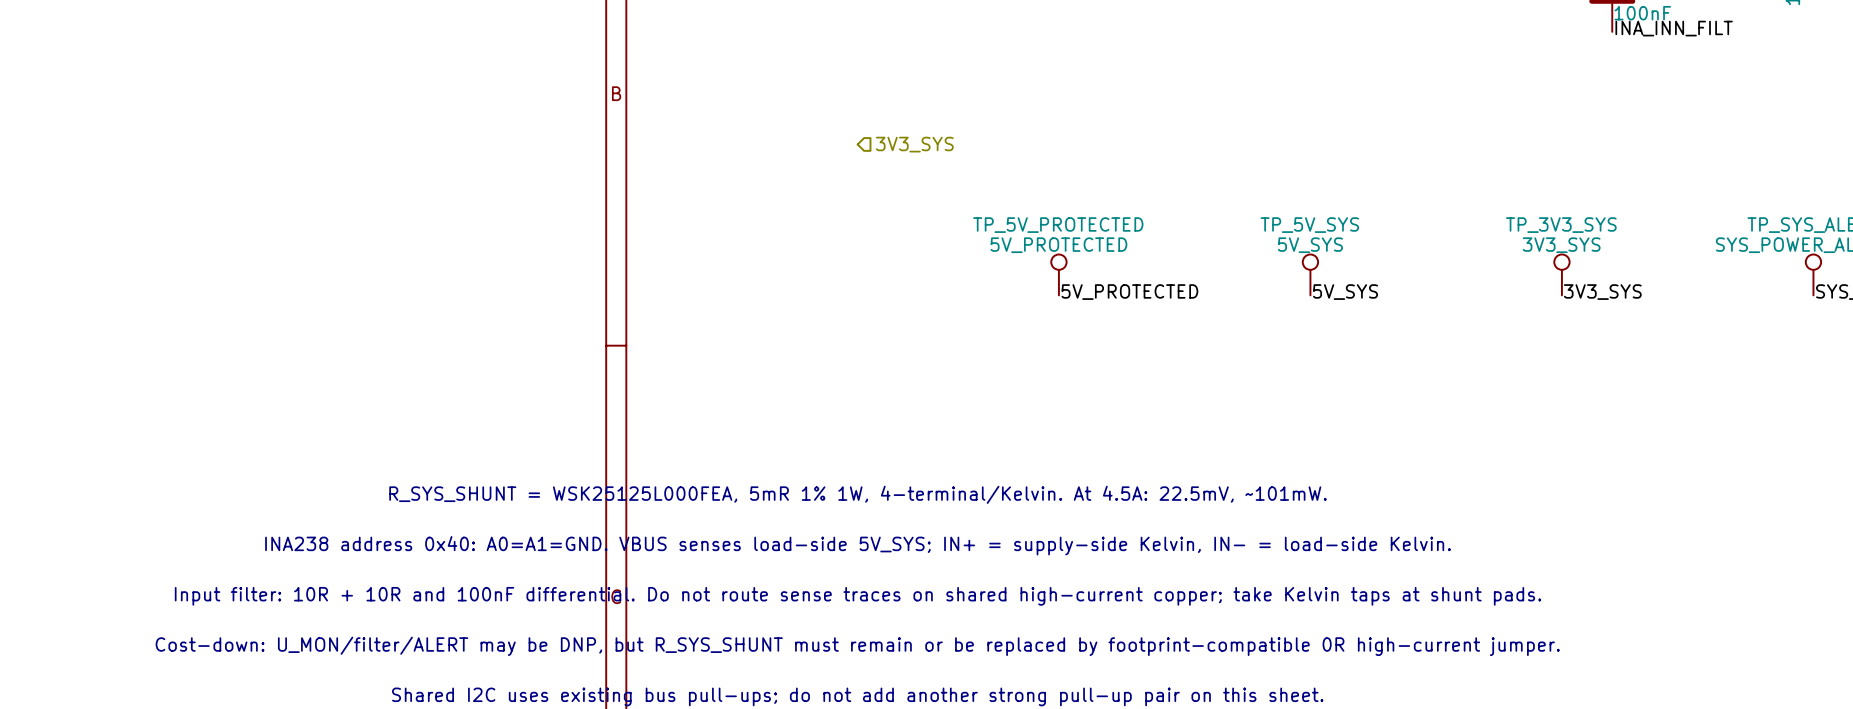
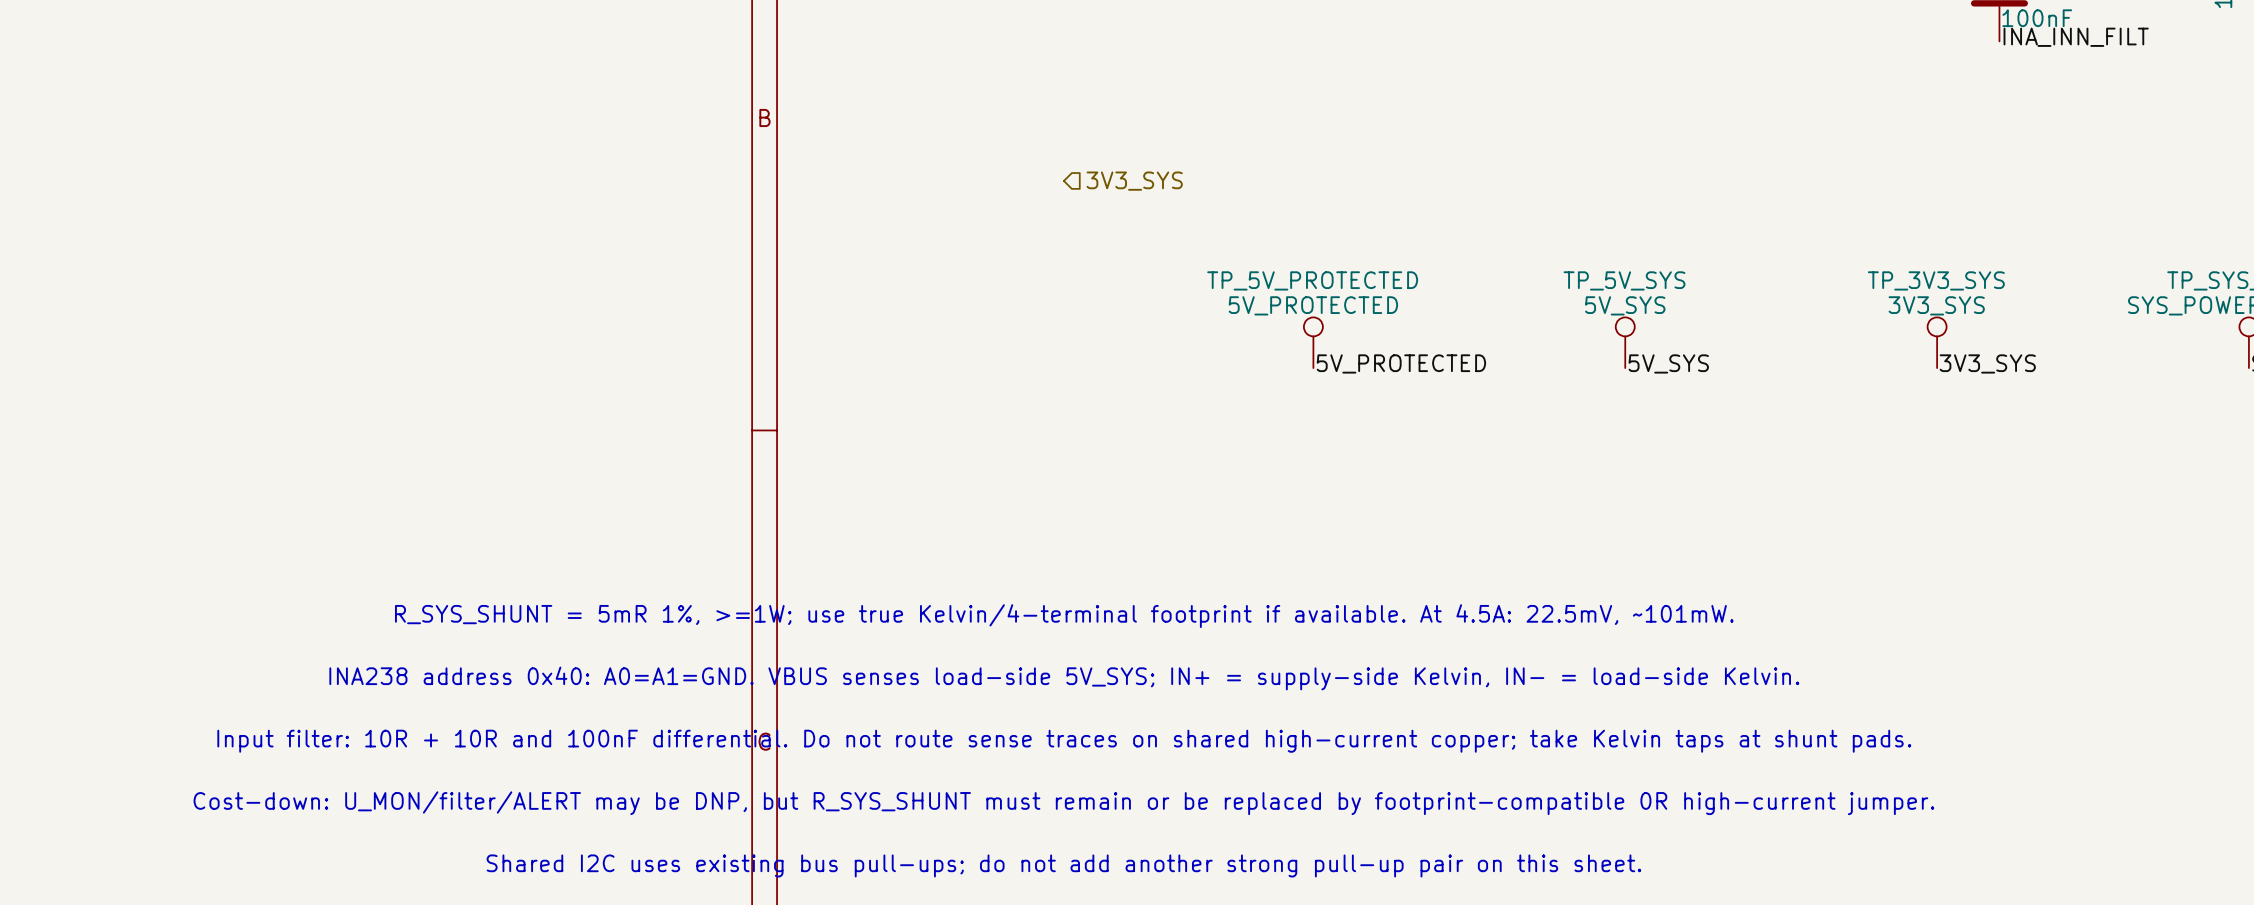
text: R_SYS_SHUNT = WSK25125L000FEA, 5mR 1% 1W, 4-terminal/Kelvin. At 4.5A: 22.5mV, ~101mW. (858, 494) -> R_SYS_SHUNT = 5mR 1%, >=1W; use true Kelvin/4-terminal footprint if available. At 4.5A: 22.5mV, ~101mW. (1064, 616)

